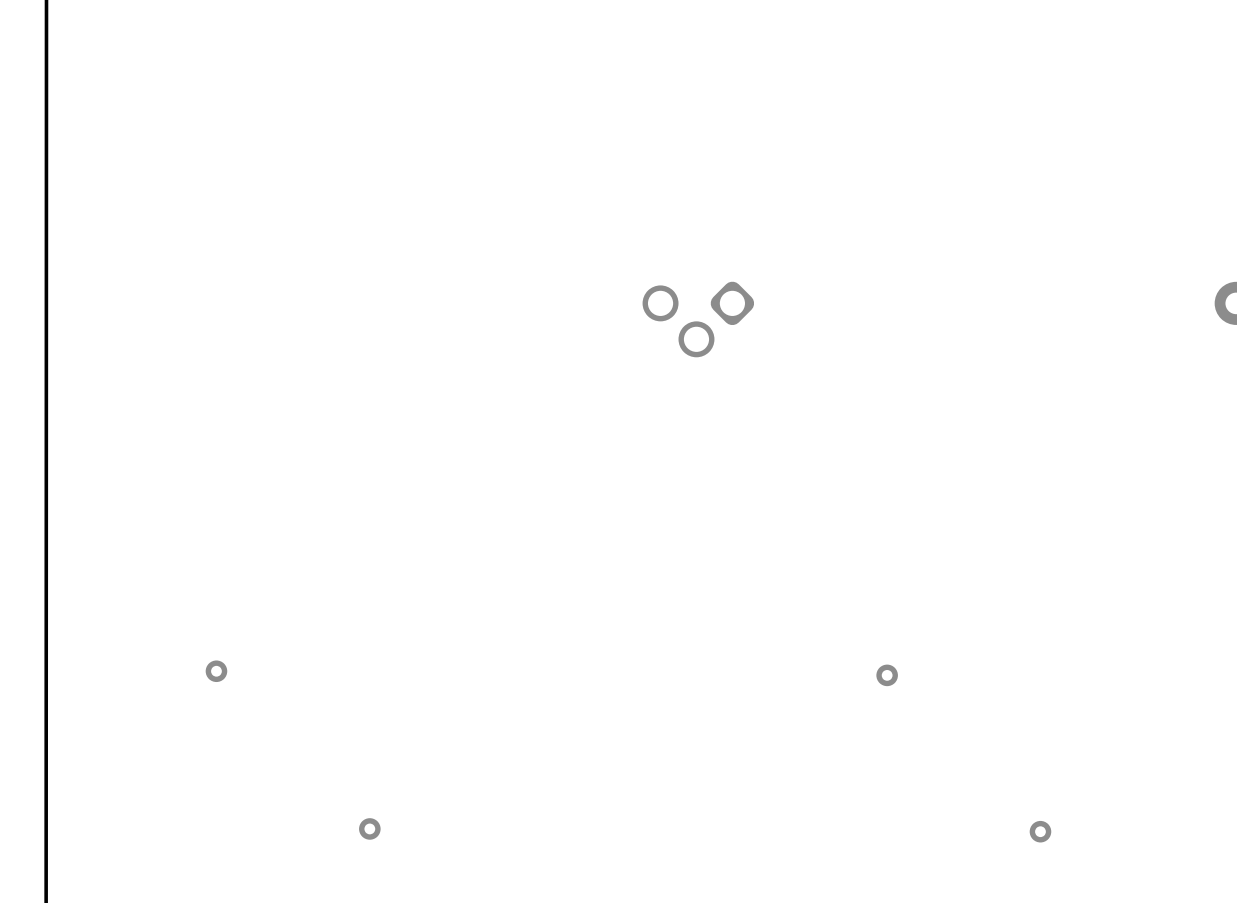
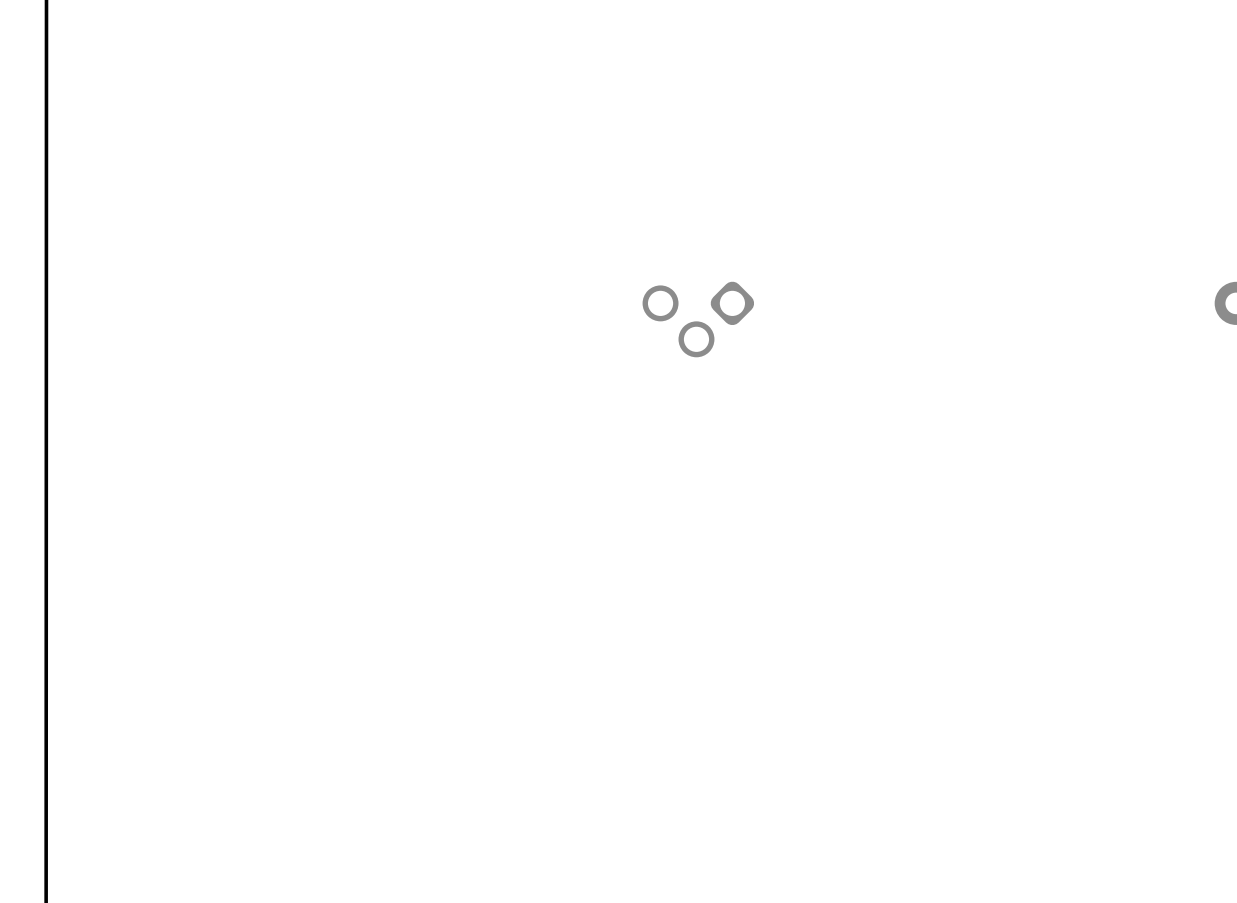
via: (216, 671) -> none
via: (887, 675) -> none
via: (369, 828) -> none
via: (1040, 831) -> none

